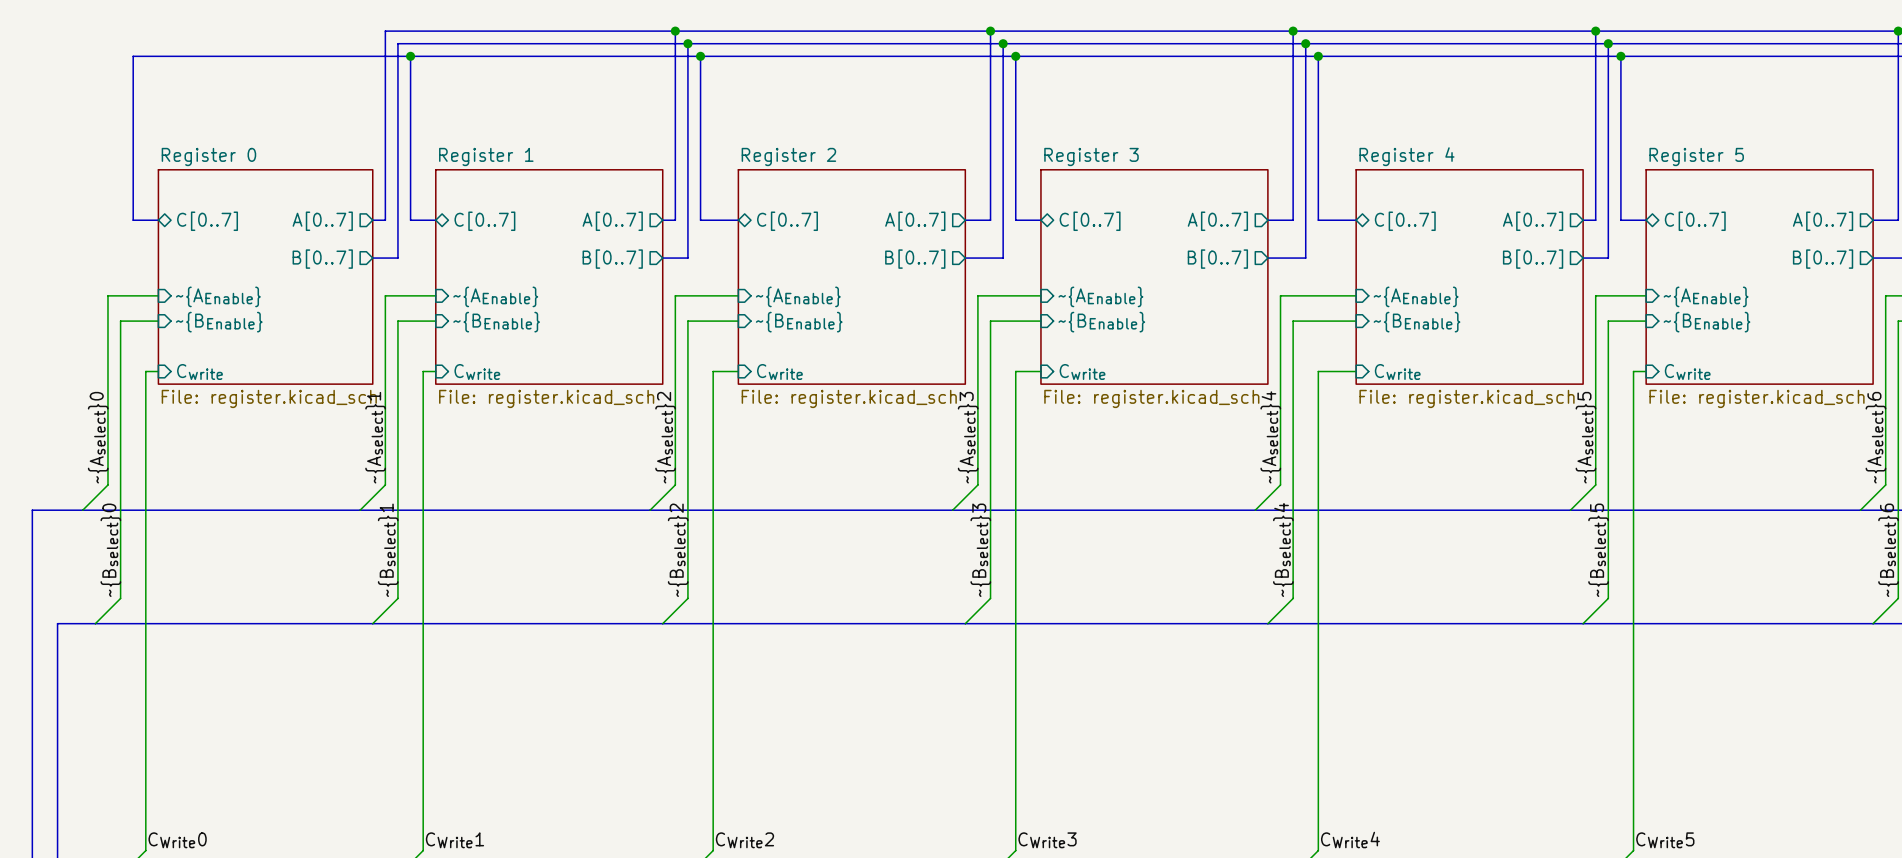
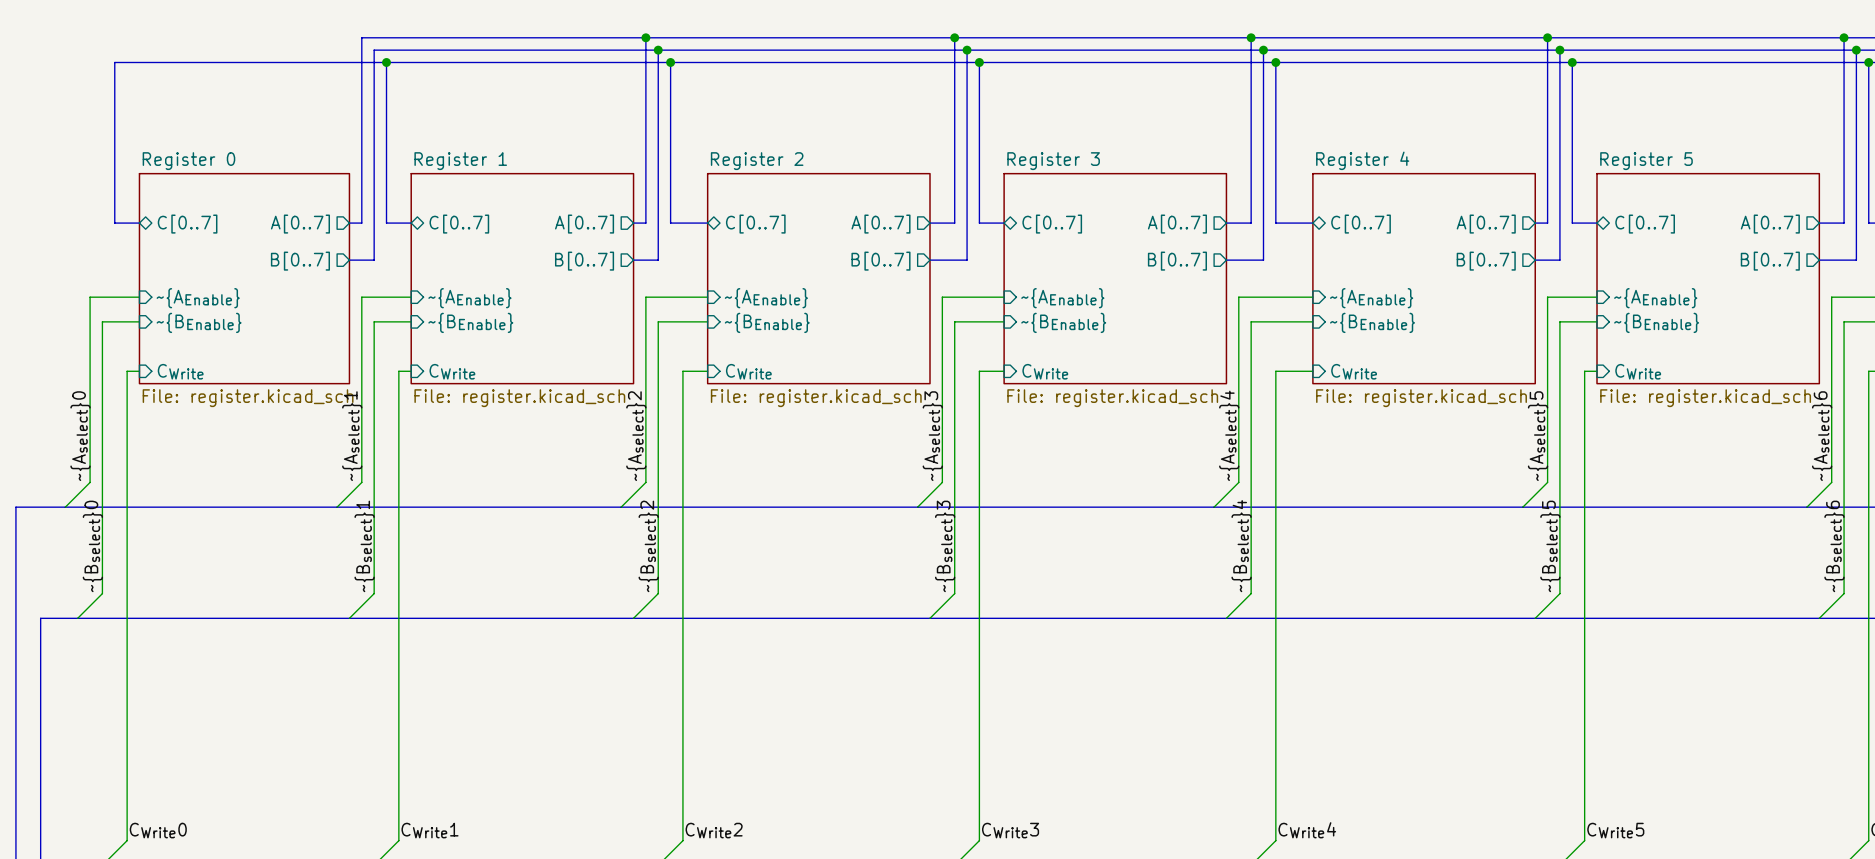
sheet pin: Cwrite (199, 371) -> CWrite (180, 371)
sheet pin: Cwrite (477, 371) -> CWrite (452, 371)
sheet pin: Cwrite (779, 371) -> CWrite (748, 371)
sheet pin: Cwrite (1082, 371) -> CWrite (1045, 371)
sheet pin: Cwrite (1397, 371) -> CWrite (1354, 371)
sheet pin: Cwrite (1687, 371) -> CWrite (1638, 371)

